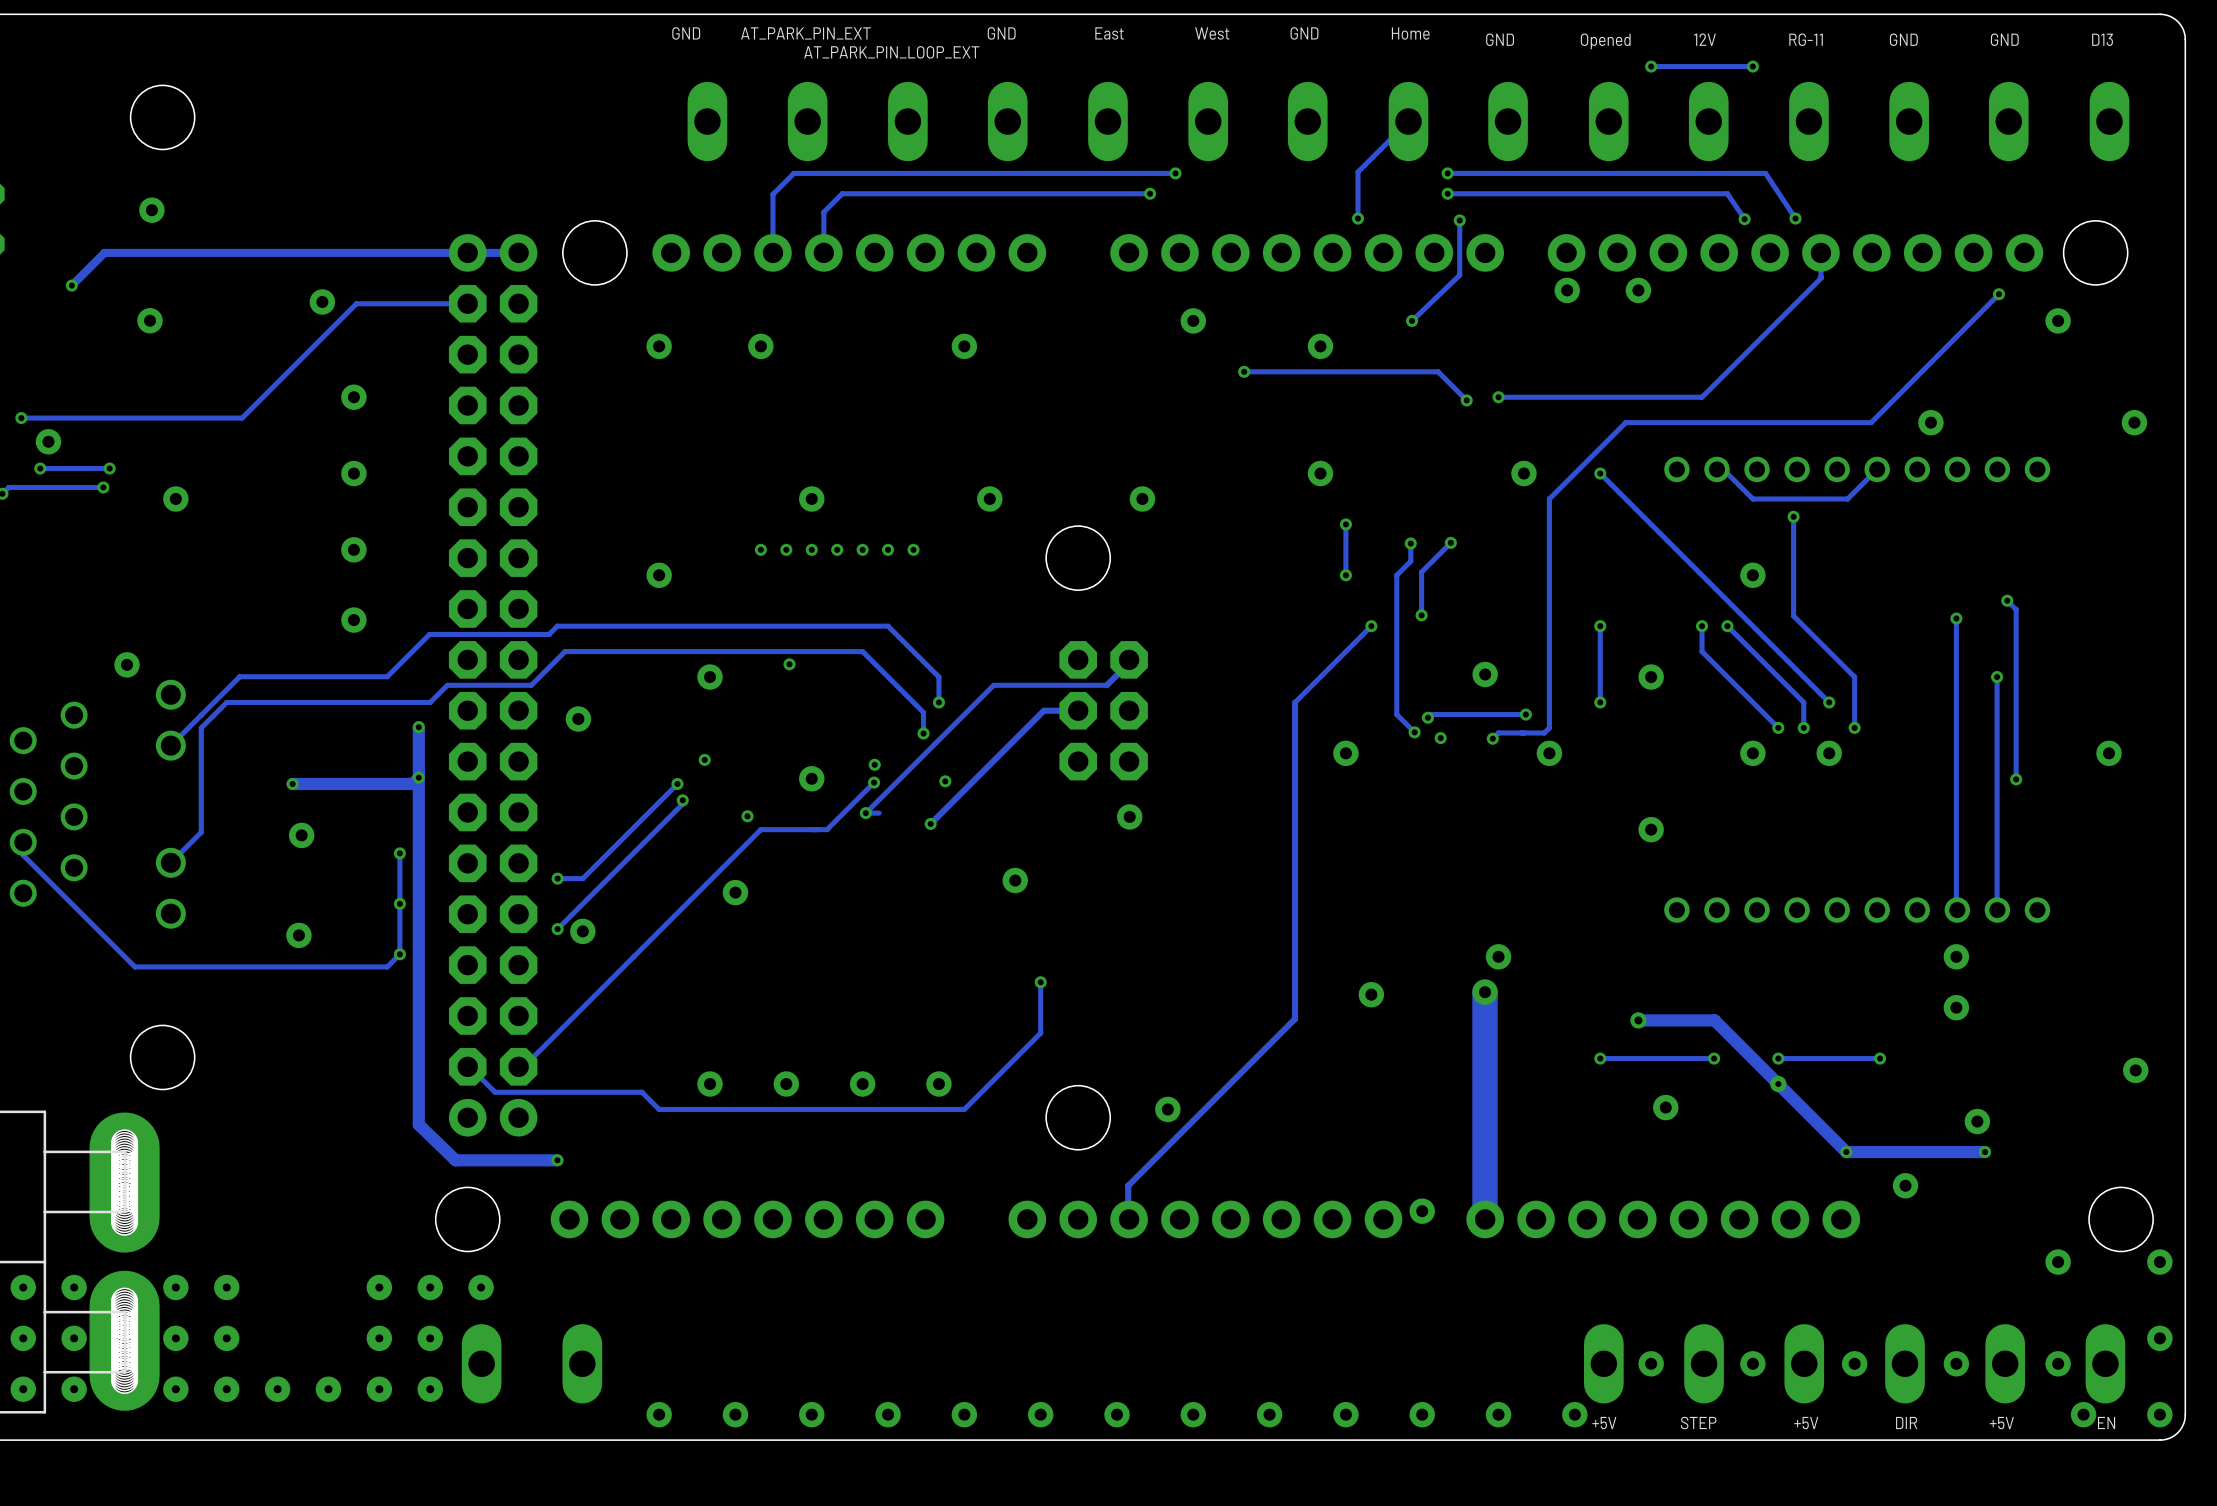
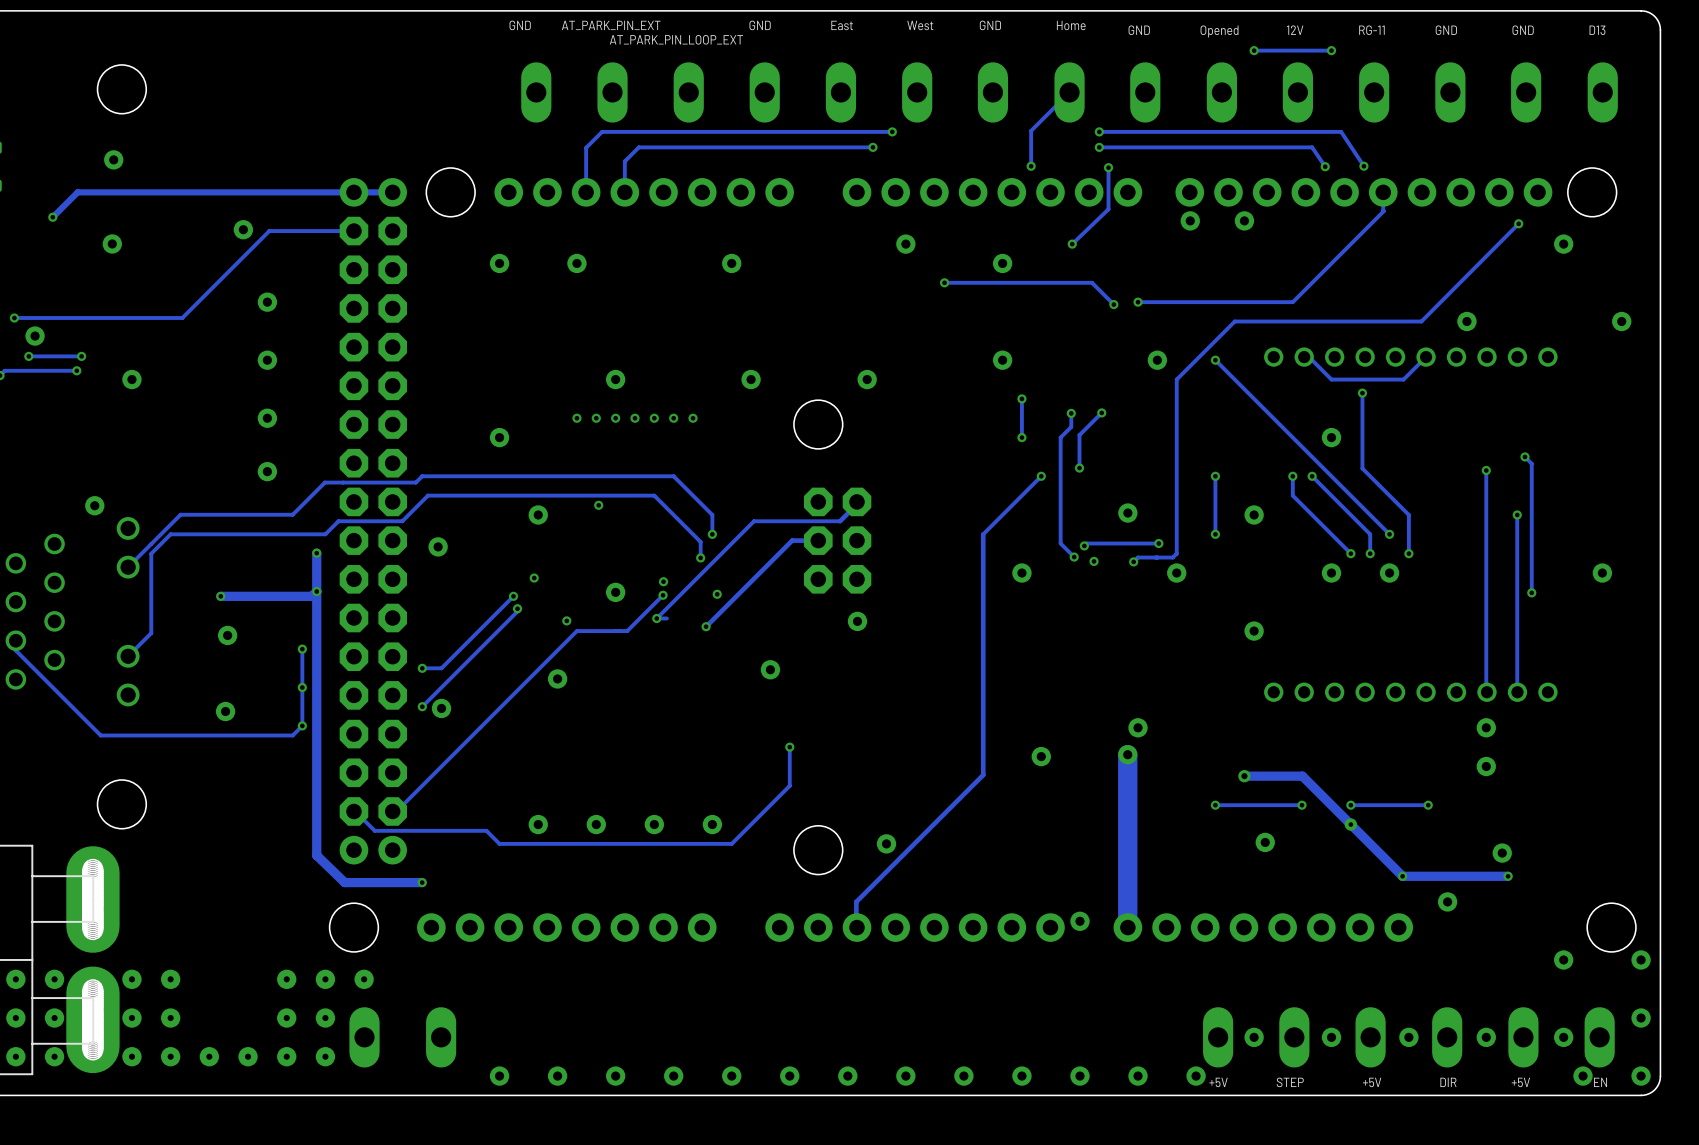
via: (2135, 1070) -> none

